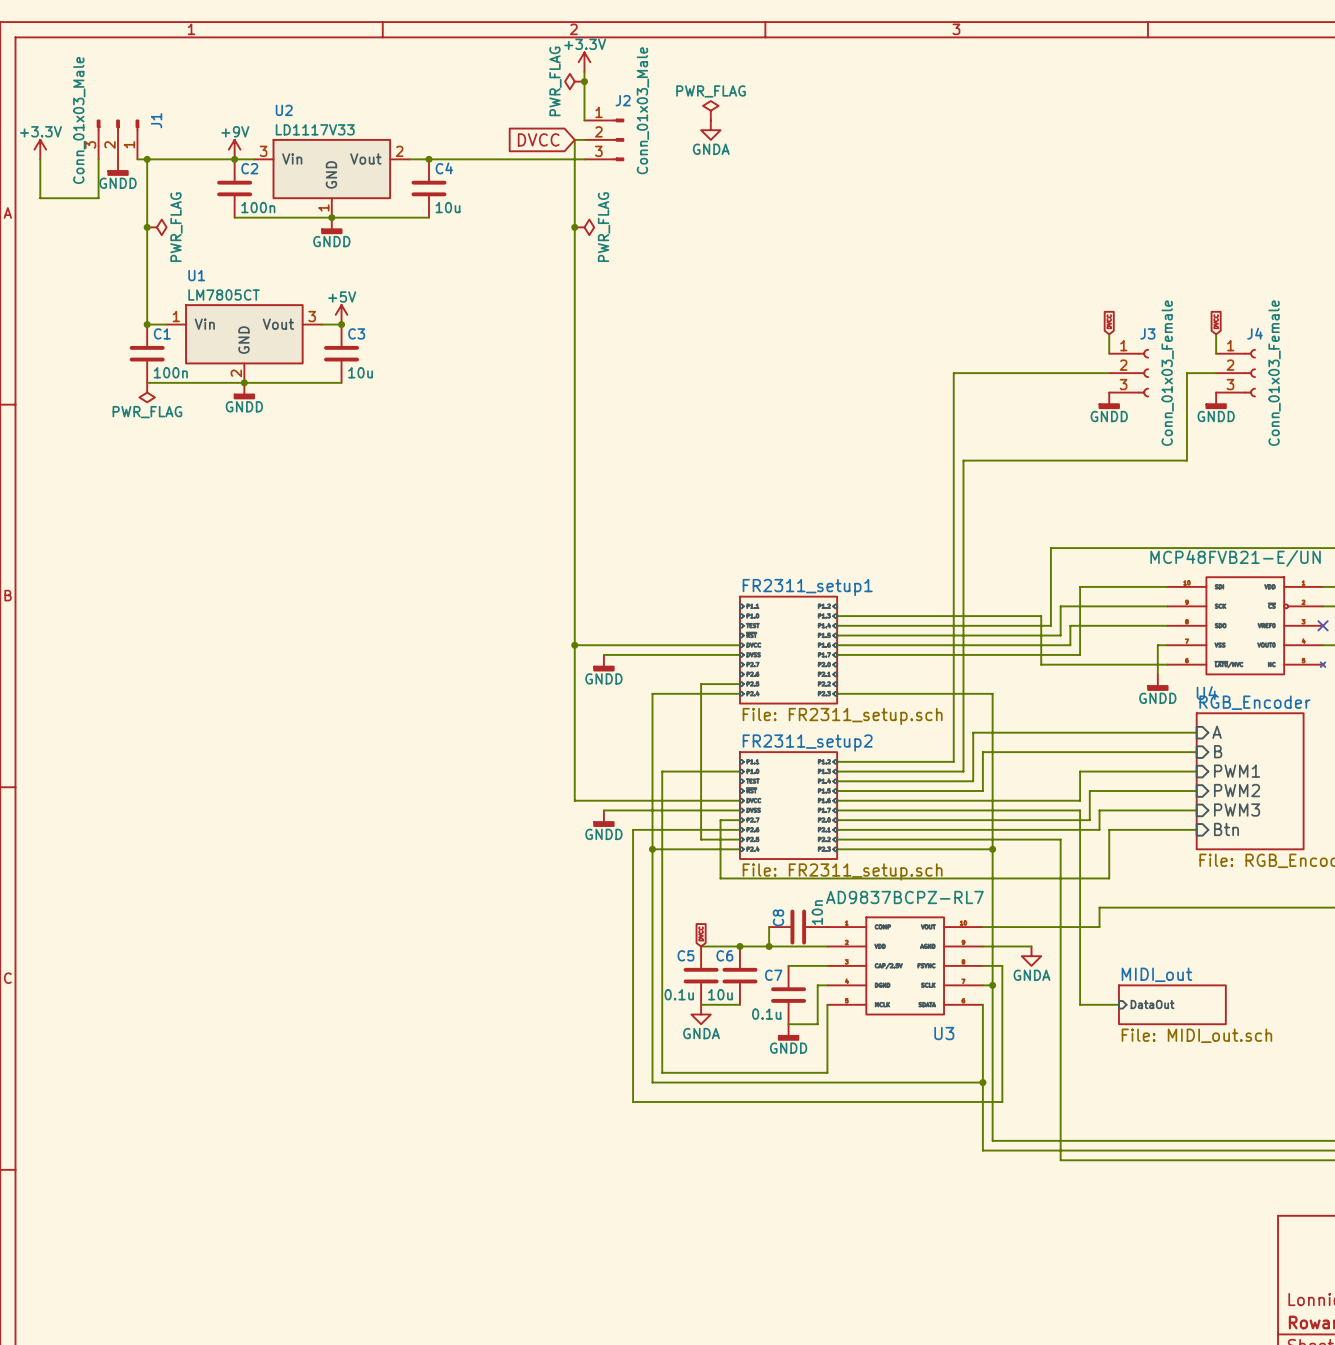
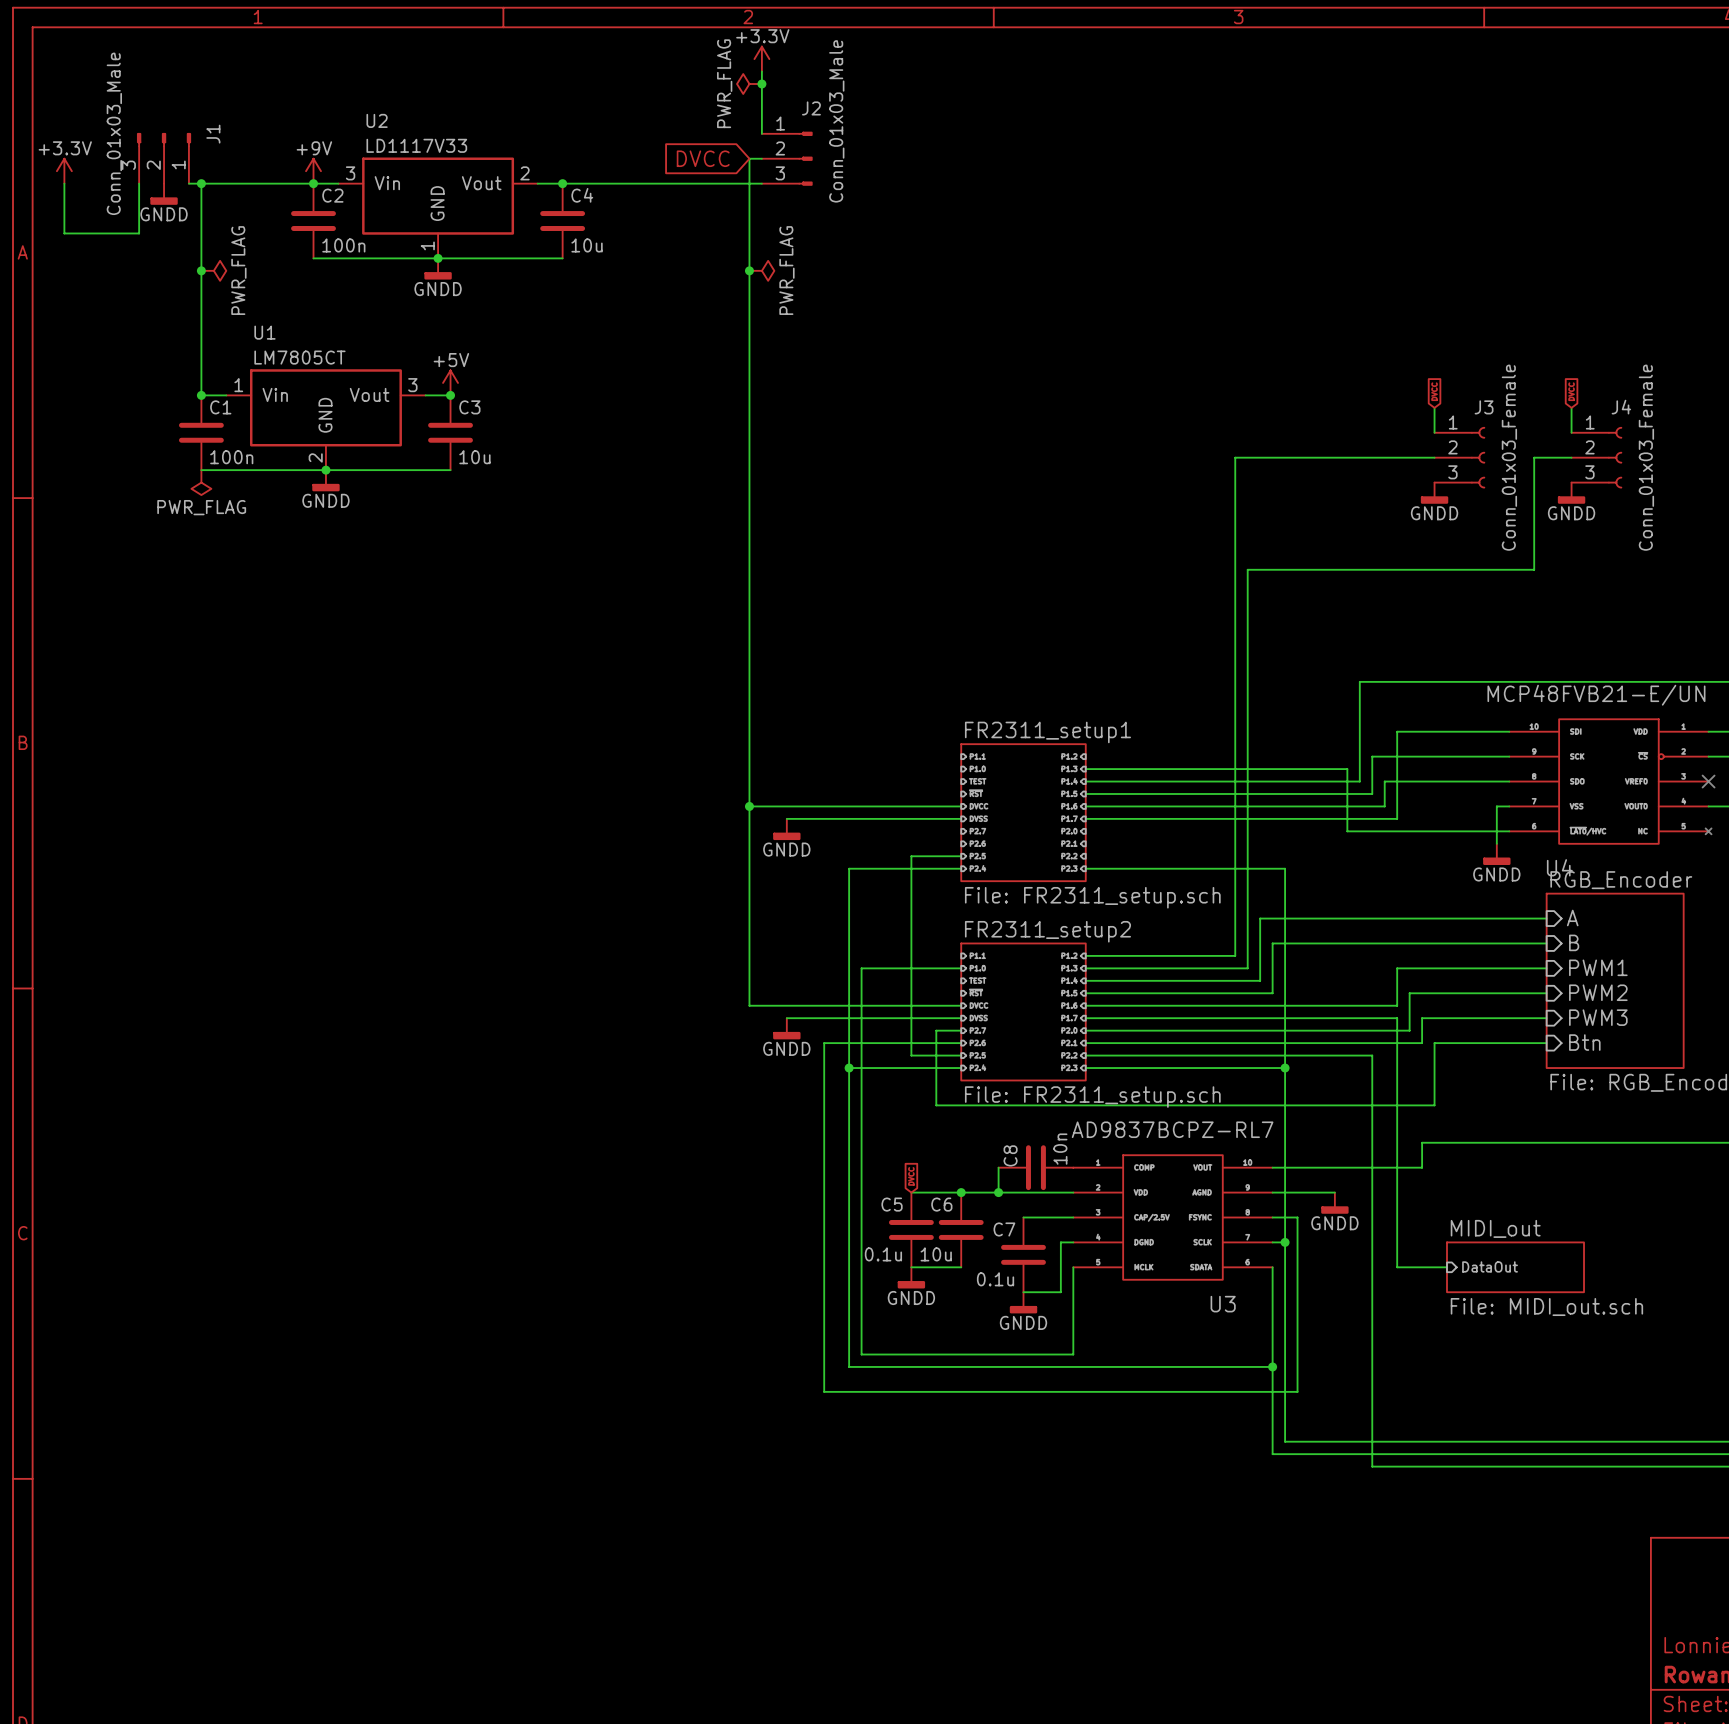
power symbol: PWR_FLAG (710, 110) -> none
power symbol: GNDA (710, 130) -> none
power symbol: GNDA (1031, 956) -> GNDD (1334, 1203)
power symbol: GNDA (701, 1014) -> GNDD (911, 1277)

